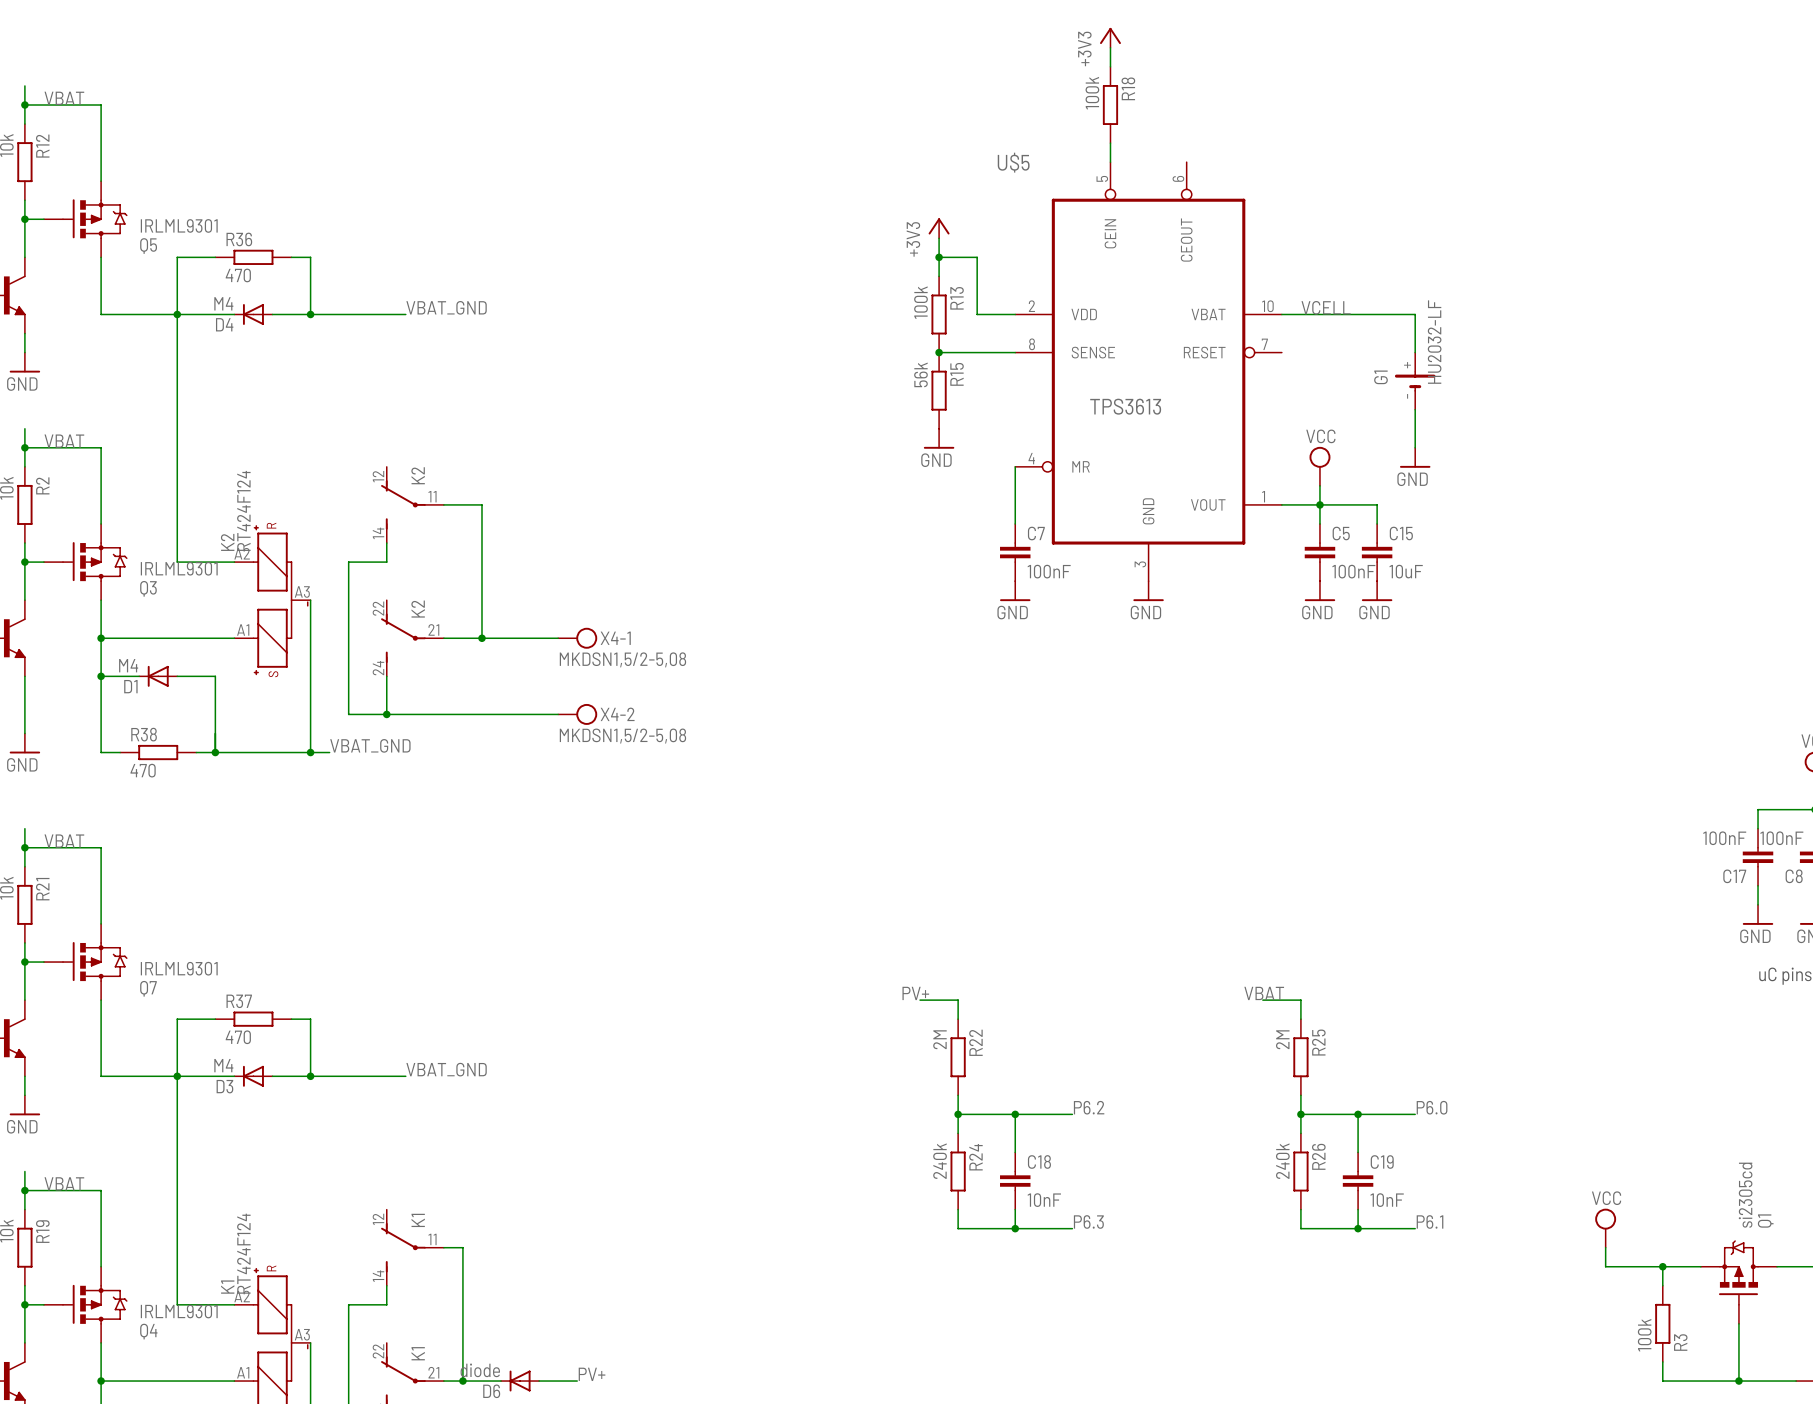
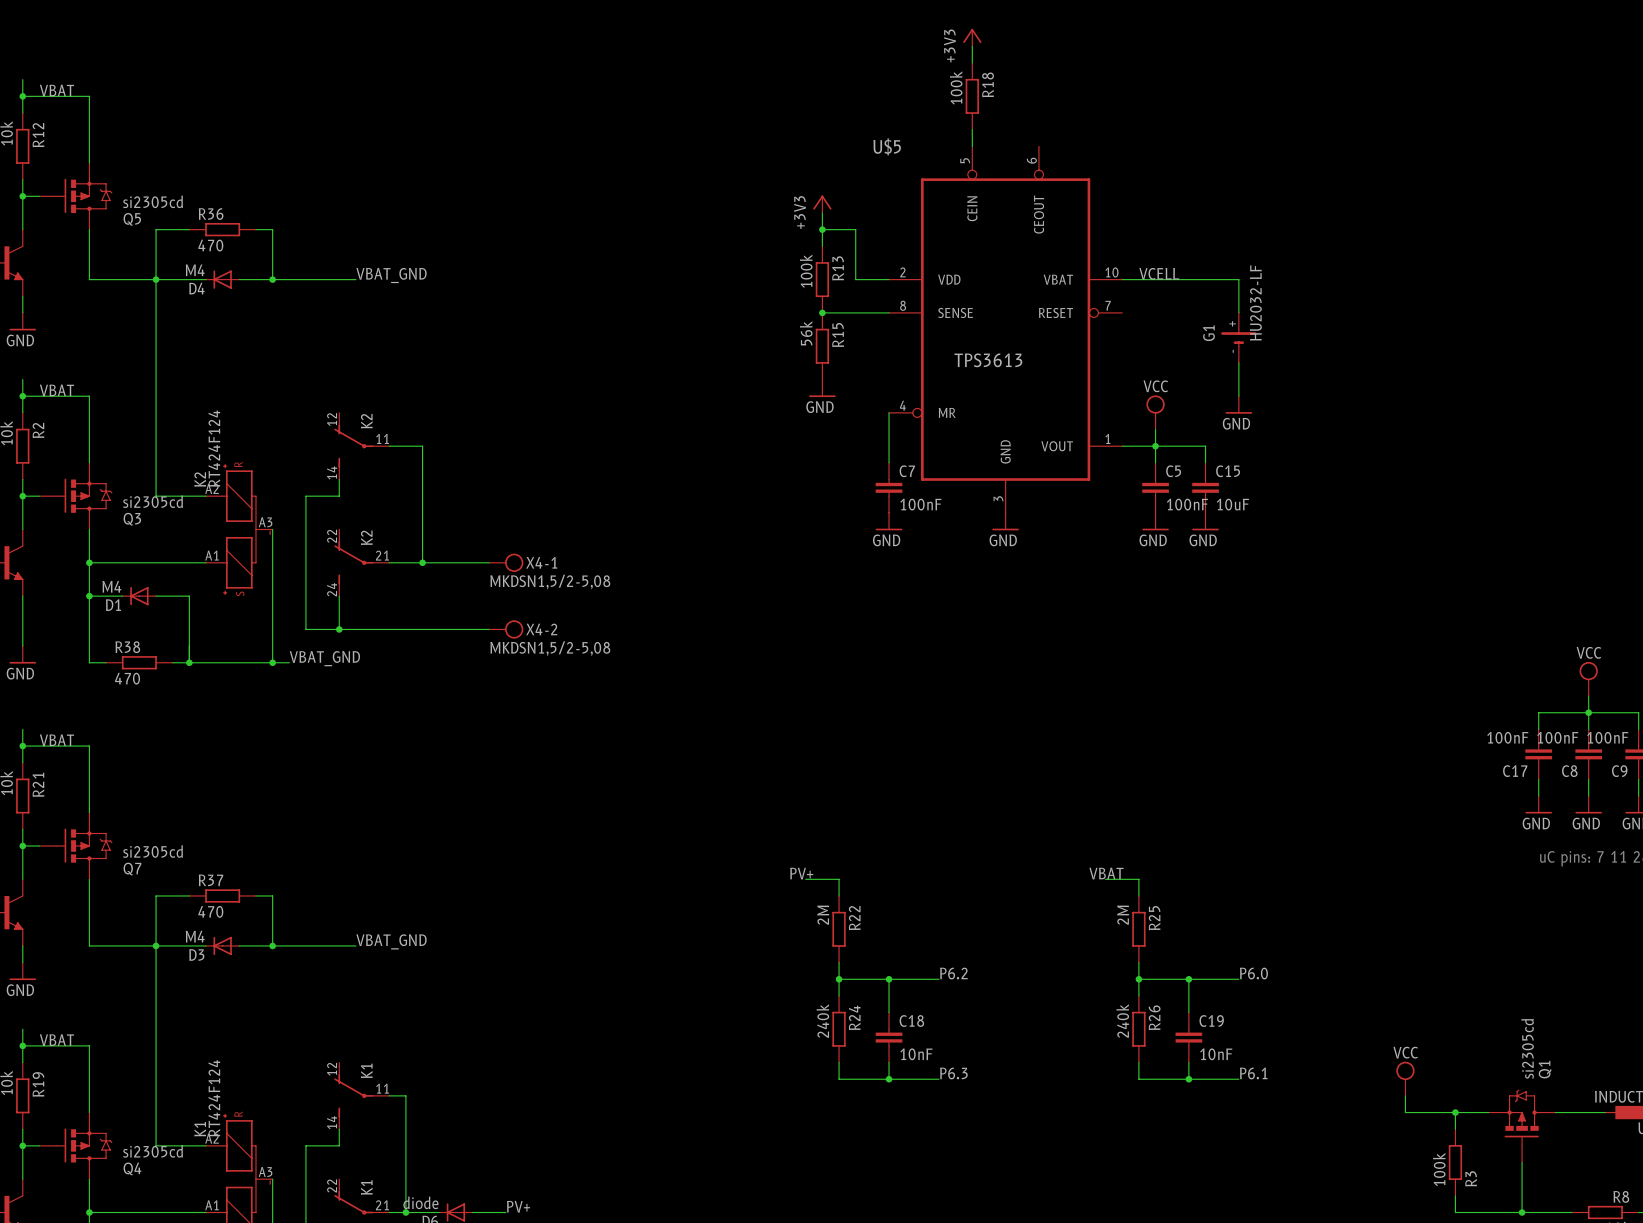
Q5 value: IRLML9301 (179, 225) -> si2305cd (153, 201)
Q3 value: IRLML9301 (179, 568) -> si2305cd (153, 501)
Q7 value: IRLML9301 (179, 968) -> si2305cd (153, 851)
Q4 value: IRLML9301 (179, 1311) -> si2305cd (153, 1151)

